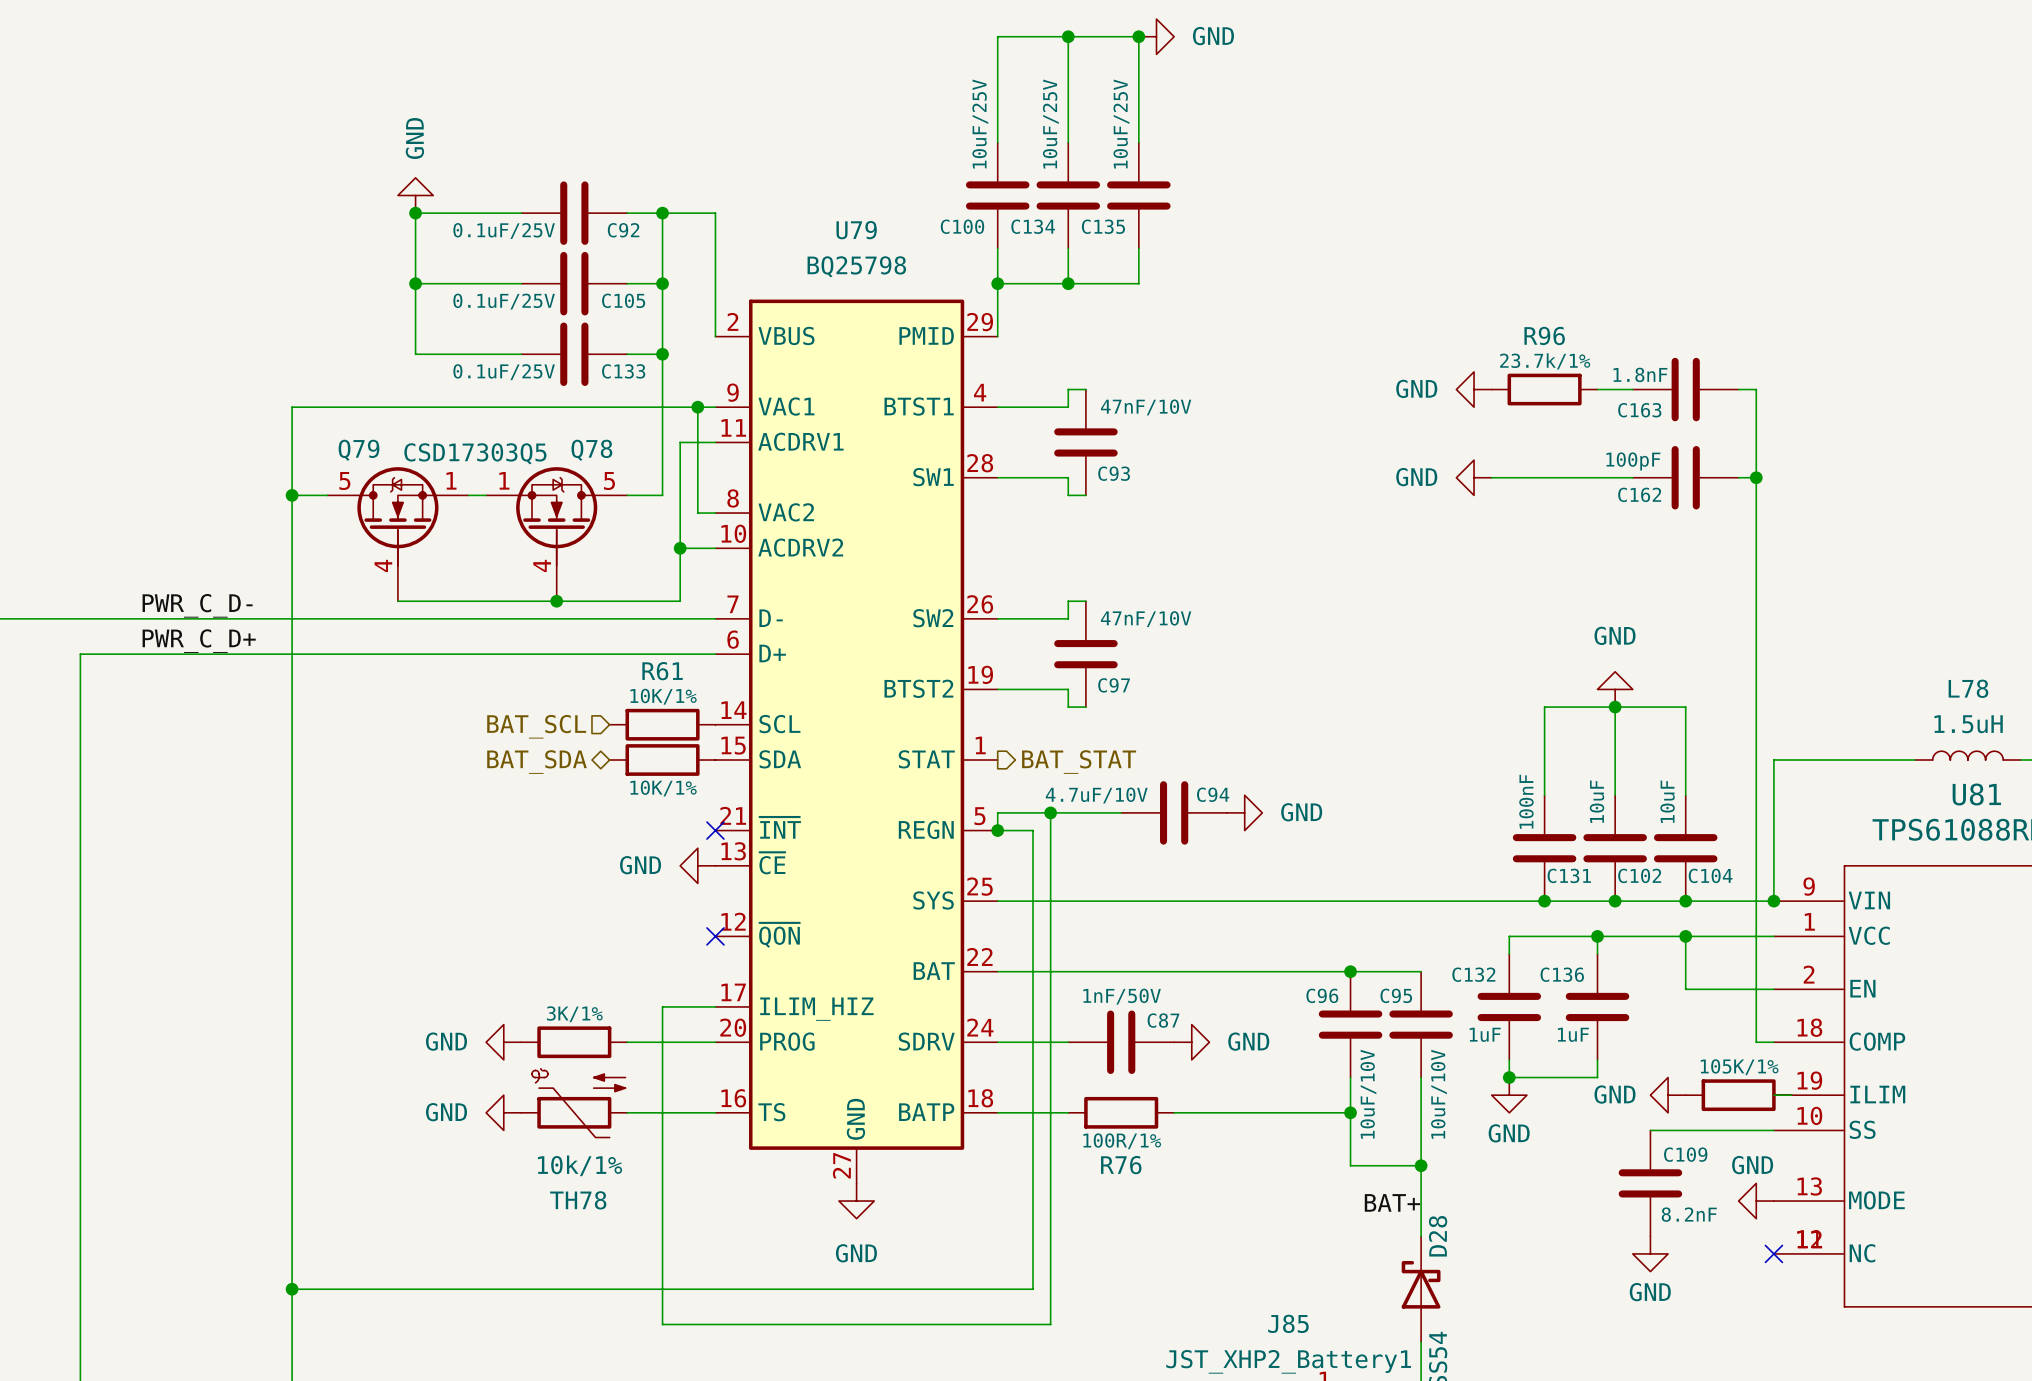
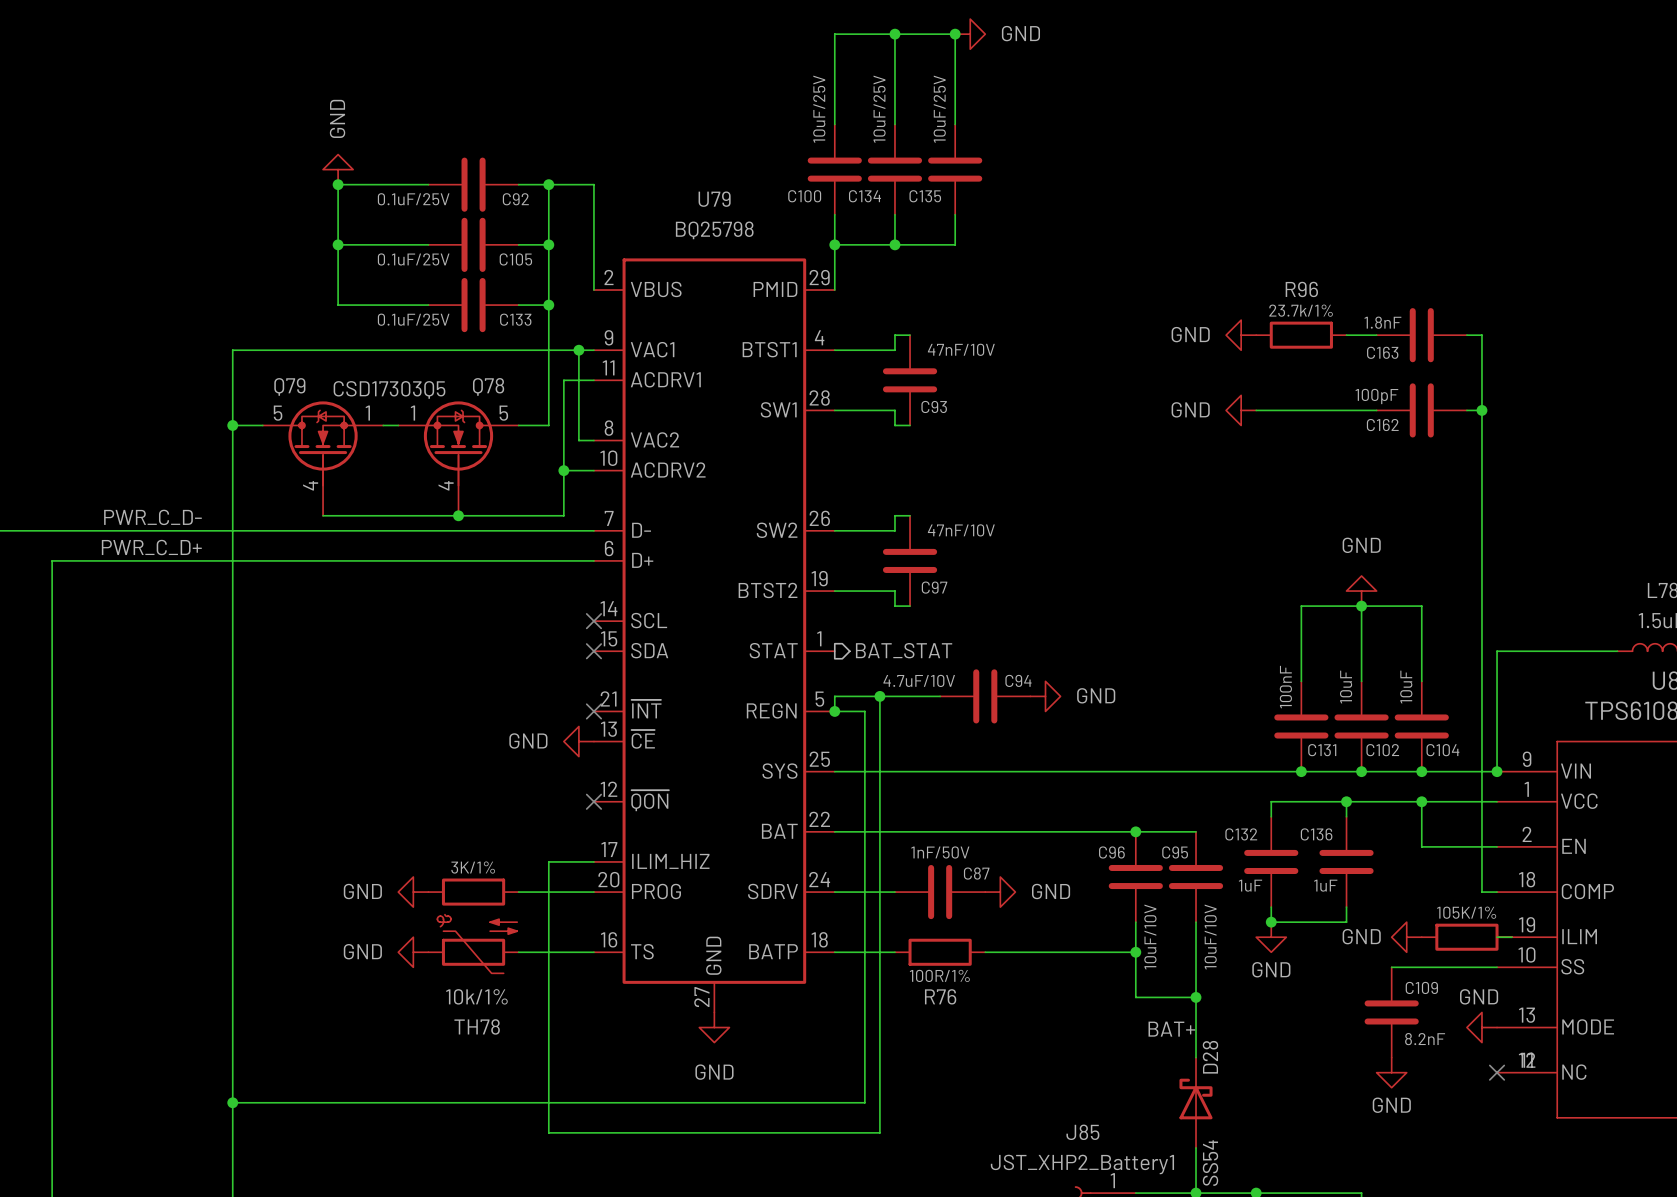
R61: 10K/1% (662, 724) -> none
no-connect mark: none -> (593, 621)
hierarchical label: BAT_SCL (536, 726) -> none
part: 10K/1% (662, 760) -> none
no-connect mark: none -> (593, 651)
hierarchical label: BAT_SDA (536, 762) -> none

